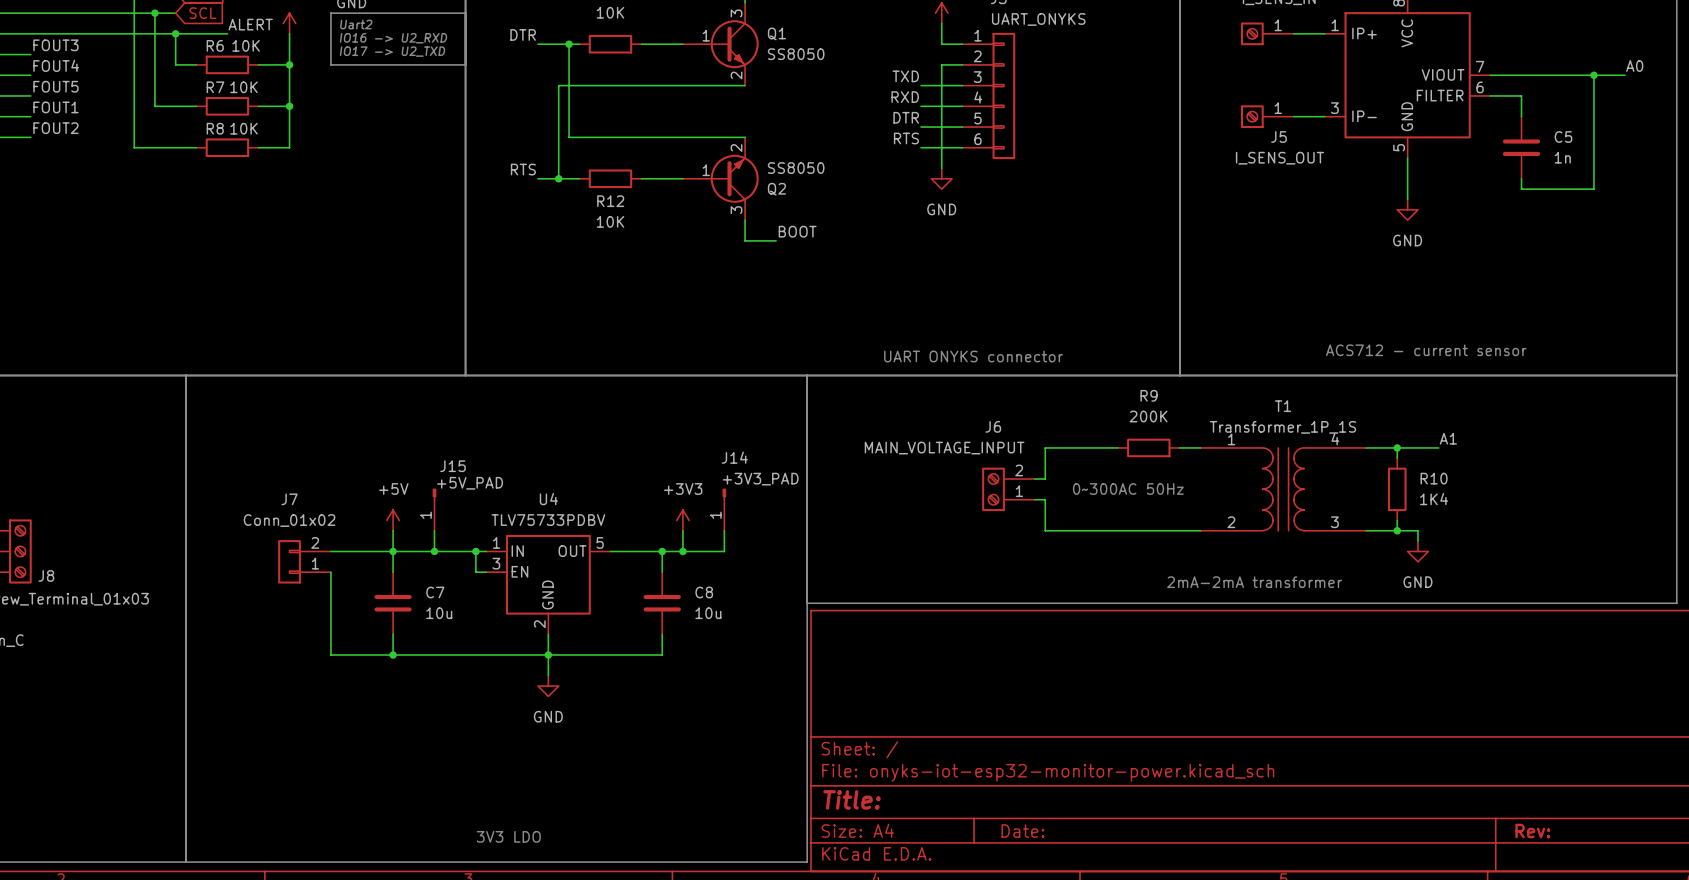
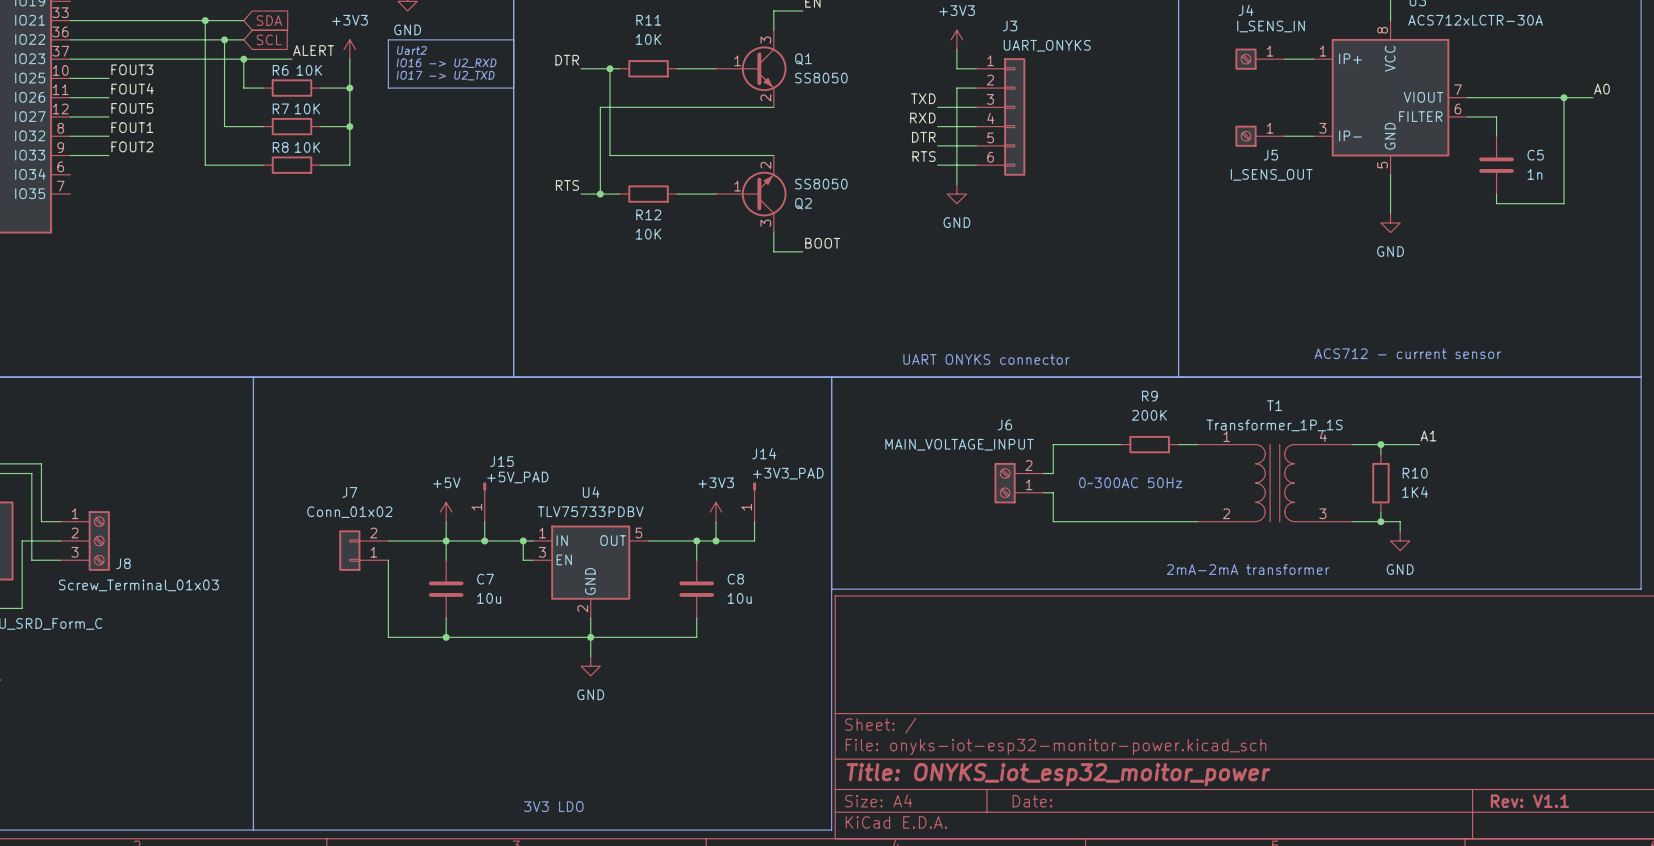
title block: Title: (852, 799) -> Title: ONYKS_iot_esp32_moitor_power (1058, 774)
title block: Rev: (1532, 831) -> Rev: V1.1 (1529, 801)

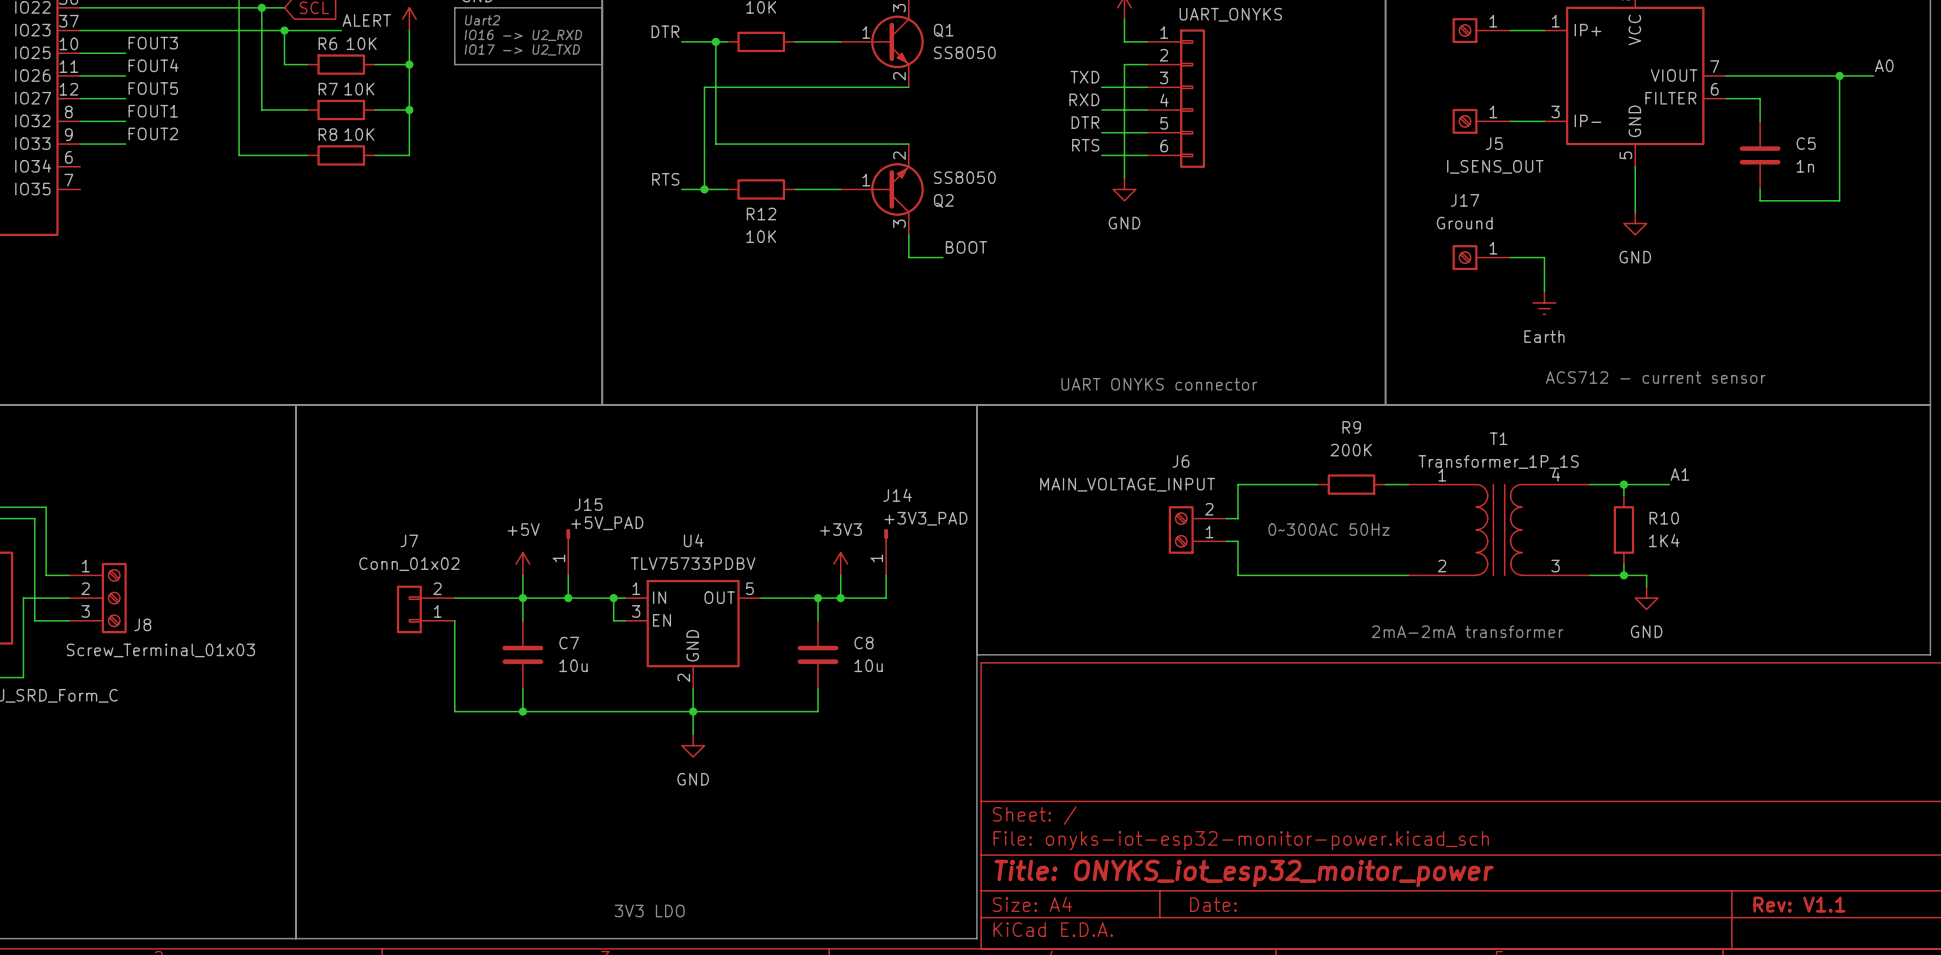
J17: none -> Ground (1481, 257)
wire: none -> (1510, 257) (1544, 257) (1544, 291)
power symbol: none -> Earth (1544, 302)

